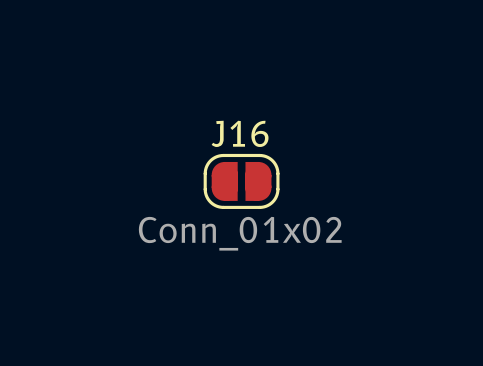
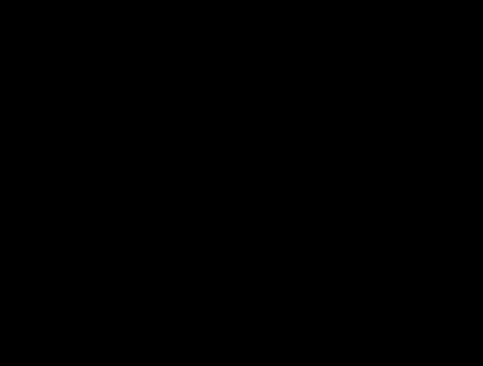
J16: Conn_01x02 (241, 181) -> none

